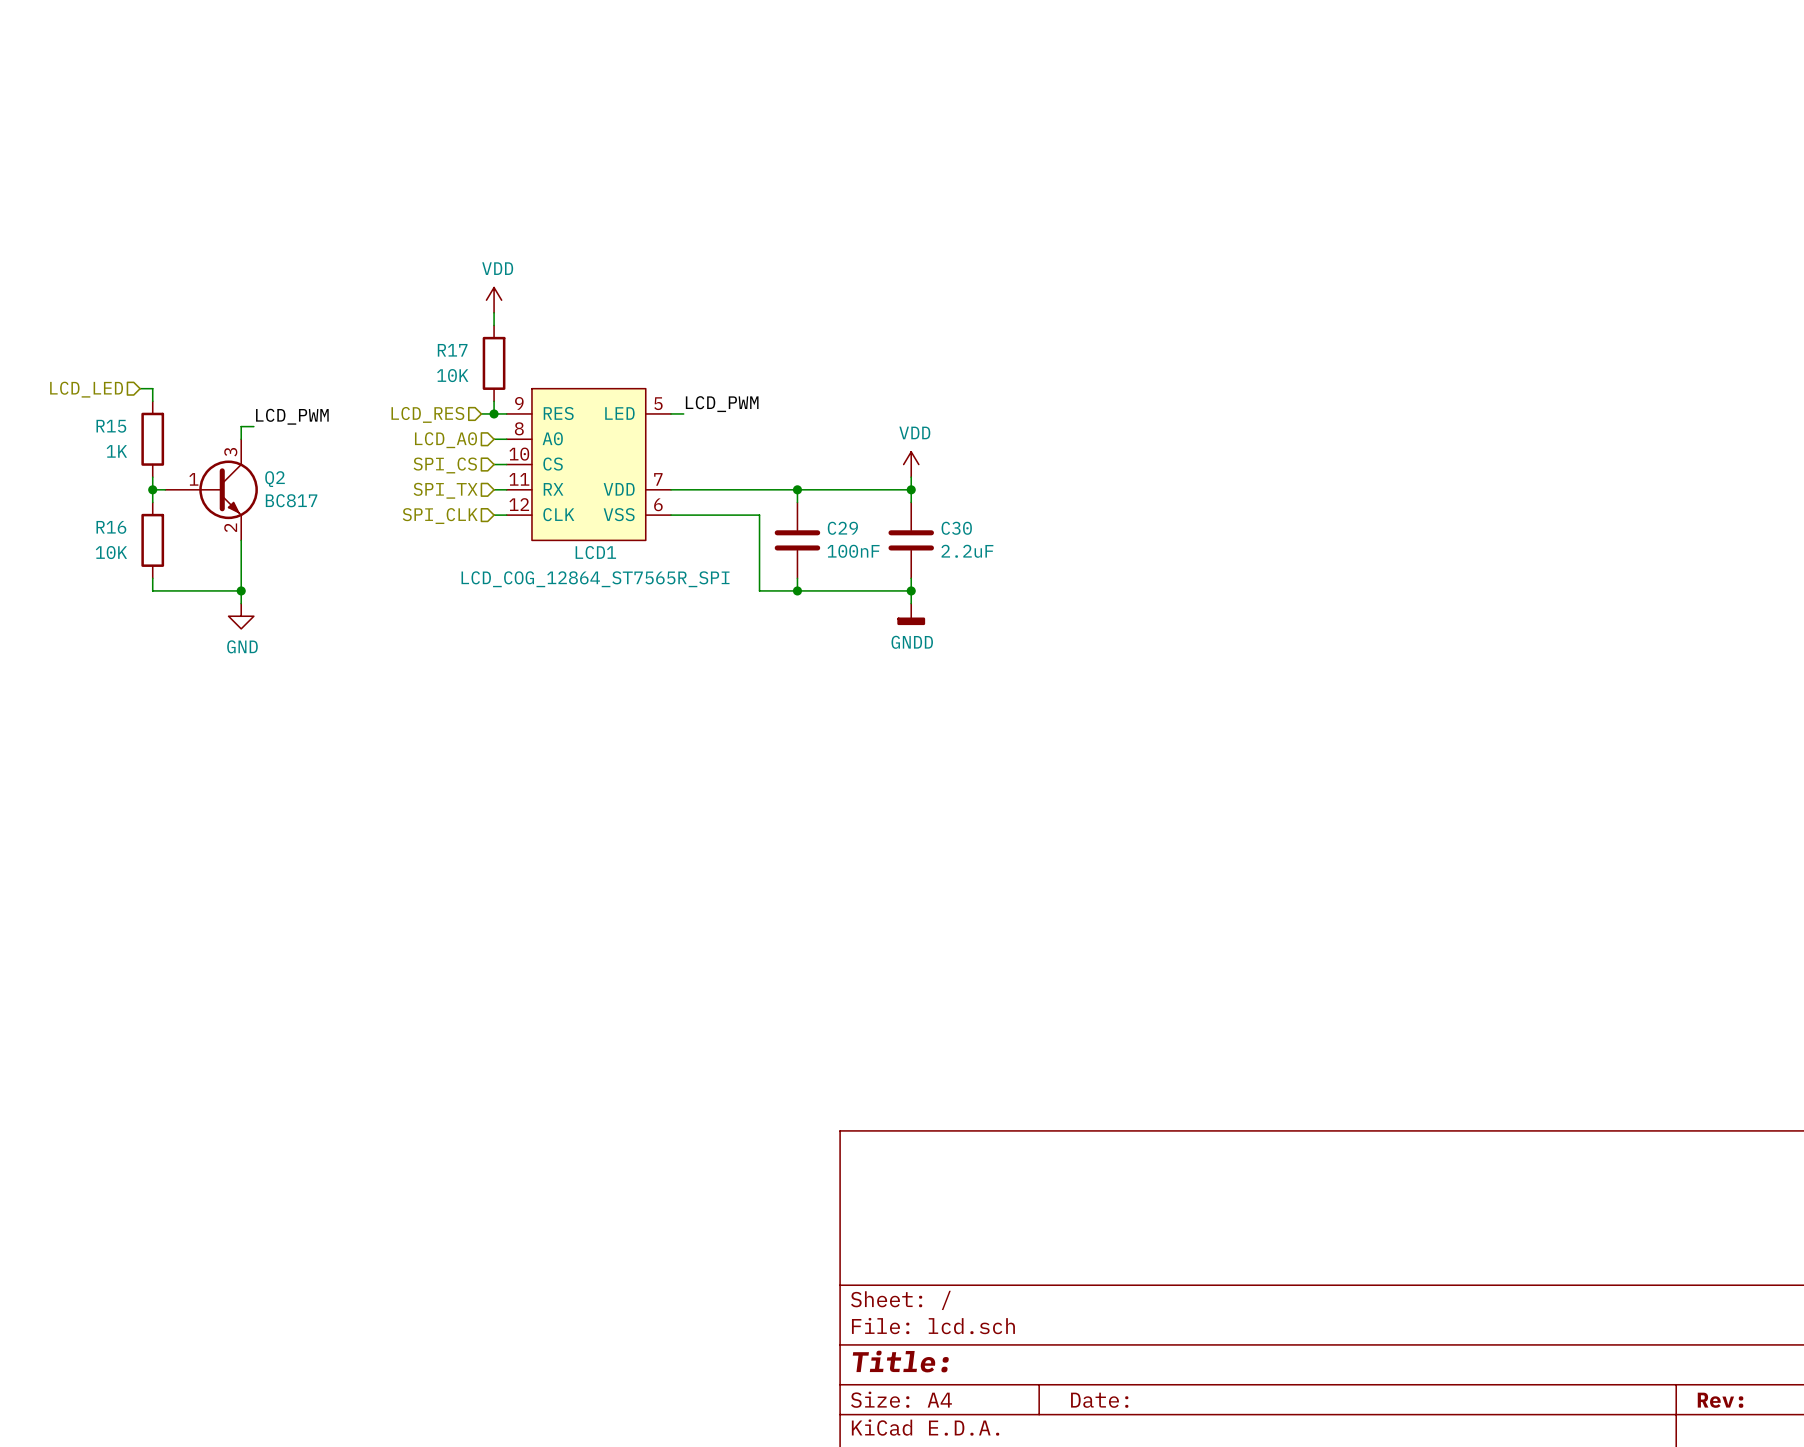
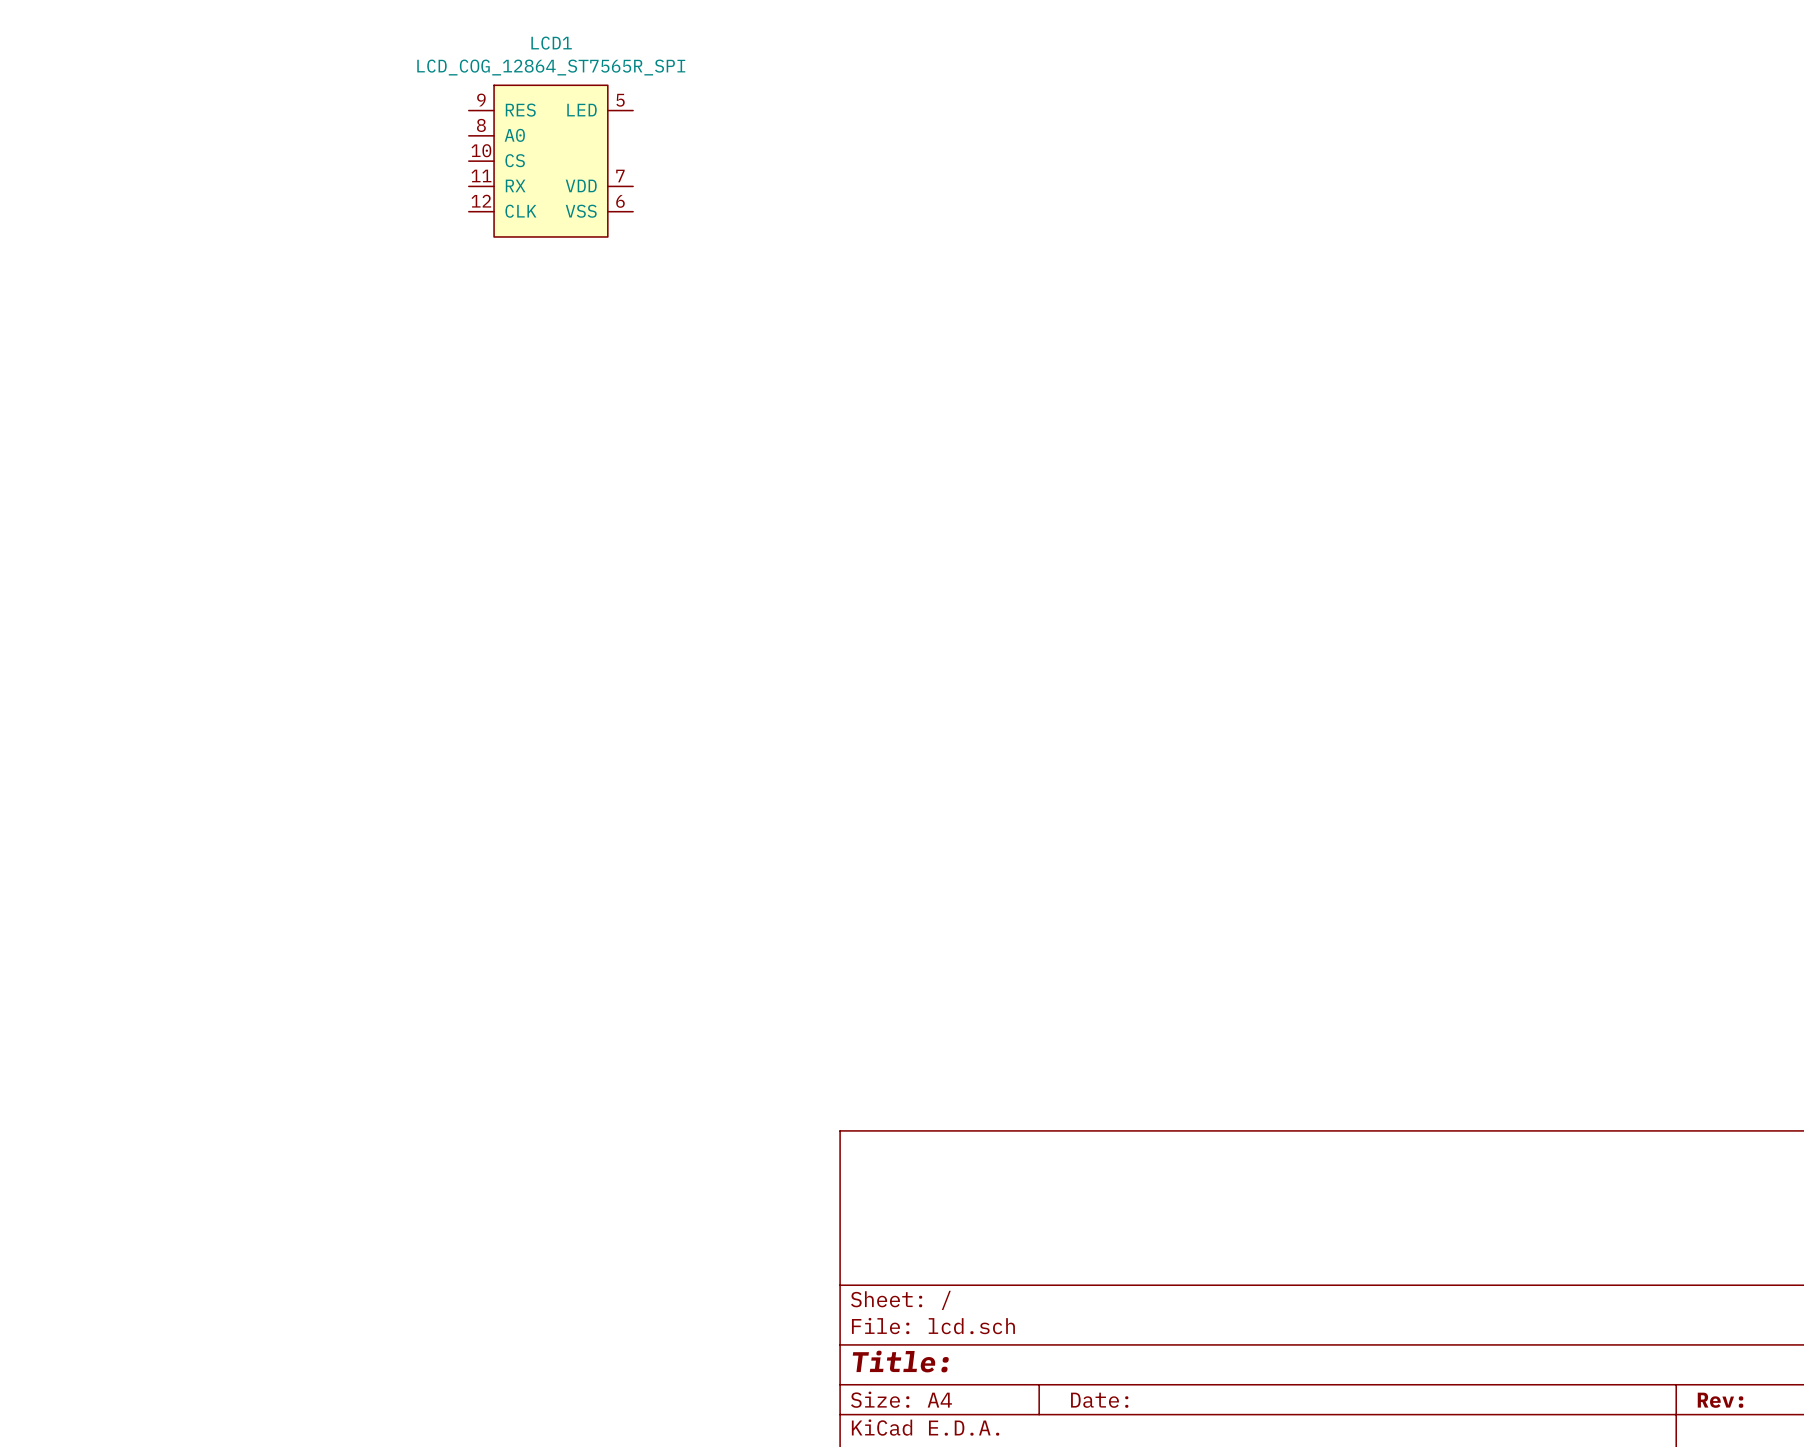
power symbol: VDD (494, 300) -> none
wire: (494, 312) (494, 325) -> none
R17: 10K (494, 363) -> none
wire: (140, 388) (152, 388) (152, 401) -> none
hierarchical label: LCD_LED (86, 389) -> none
wire: (494, 401) (494, 413) -> none
label: LCD_PWM (722, 404) -> none
wire: (481, 413) (506, 413) -> none
junction: (494, 413) -> none
wire: (671, 413) (683, 413) -> none
hierarchical label: LCD_RES (427, 414) -> none
label: LCD_PWM (292, 416) -> none
wire: (253, 426) (241, 426) (241, 439) -> none
R15: 1K (152, 439) -> none
wire: (494, 439) (506, 439) -> none
hierarchical label: LCD_A0 (445, 440) -> none
wire: (494, 464) (506, 464) -> none
LCD1 position: (588, 464) -> (550, 161)
power symbol: VDD (911, 464) -> none
hierarchical label: SPI_CS (445, 465) -> none
wire: (152, 477) (152, 502) -> none
wire: (911, 477) (911, 502) -> none
wire: (152, 489) (165, 489) -> none
junction: (152, 489) -> none
Q2: BC817 (211, 489) -> none
wire: (494, 489) (506, 489) -> none
wire: (671, 489) (911, 489) -> none
wire: (797, 489) (797, 502) -> none
junction: (797, 489) -> none
junction: (911, 489) -> none
hierarchical label: SPI_TX (445, 490) -> none
wire: (494, 515) (506, 515) -> none
wire: (671, 515) (759, 515) (759, 590) (911, 590) -> none
hierarchical label: SPI_CLK (440, 516) -> none
R16: 10K (152, 540) -> none
wire: (241, 540) (241, 603) -> none
C29: 100nF (797, 540) -> none
C30: 2.2uF (911, 540) -> none
LCD1 name position: LCD1 (595, 552) -> LCD1 (551, 43)
wire: (152, 578) (152, 590) (241, 590) -> none
wire: (797, 578) (797, 590) -> none
wire: (911, 578) (911, 603) -> none
LCD1 value position: LCD_COG_12864_ST7565R_SPI (595, 579) -> LCD_COG_12864_ST7565R_SPI (551, 67)
junction: (241, 590) -> none
junction: (797, 590) -> none
junction: (911, 590) -> none
power symbol: GNDD (911, 614) -> none
power symbol: GND (241, 616) -> none

